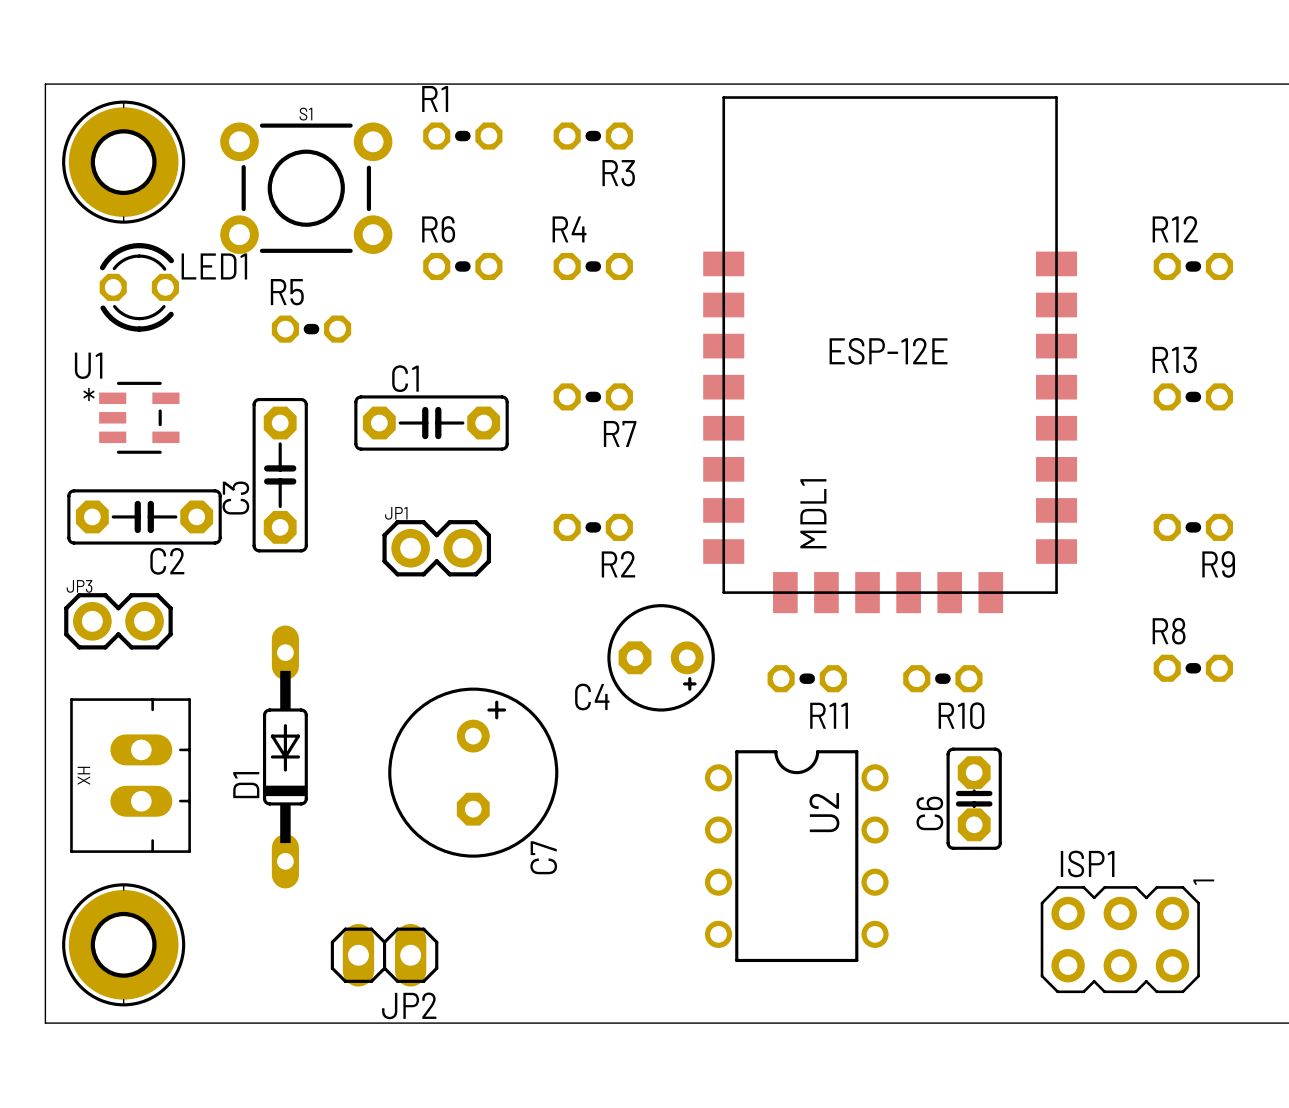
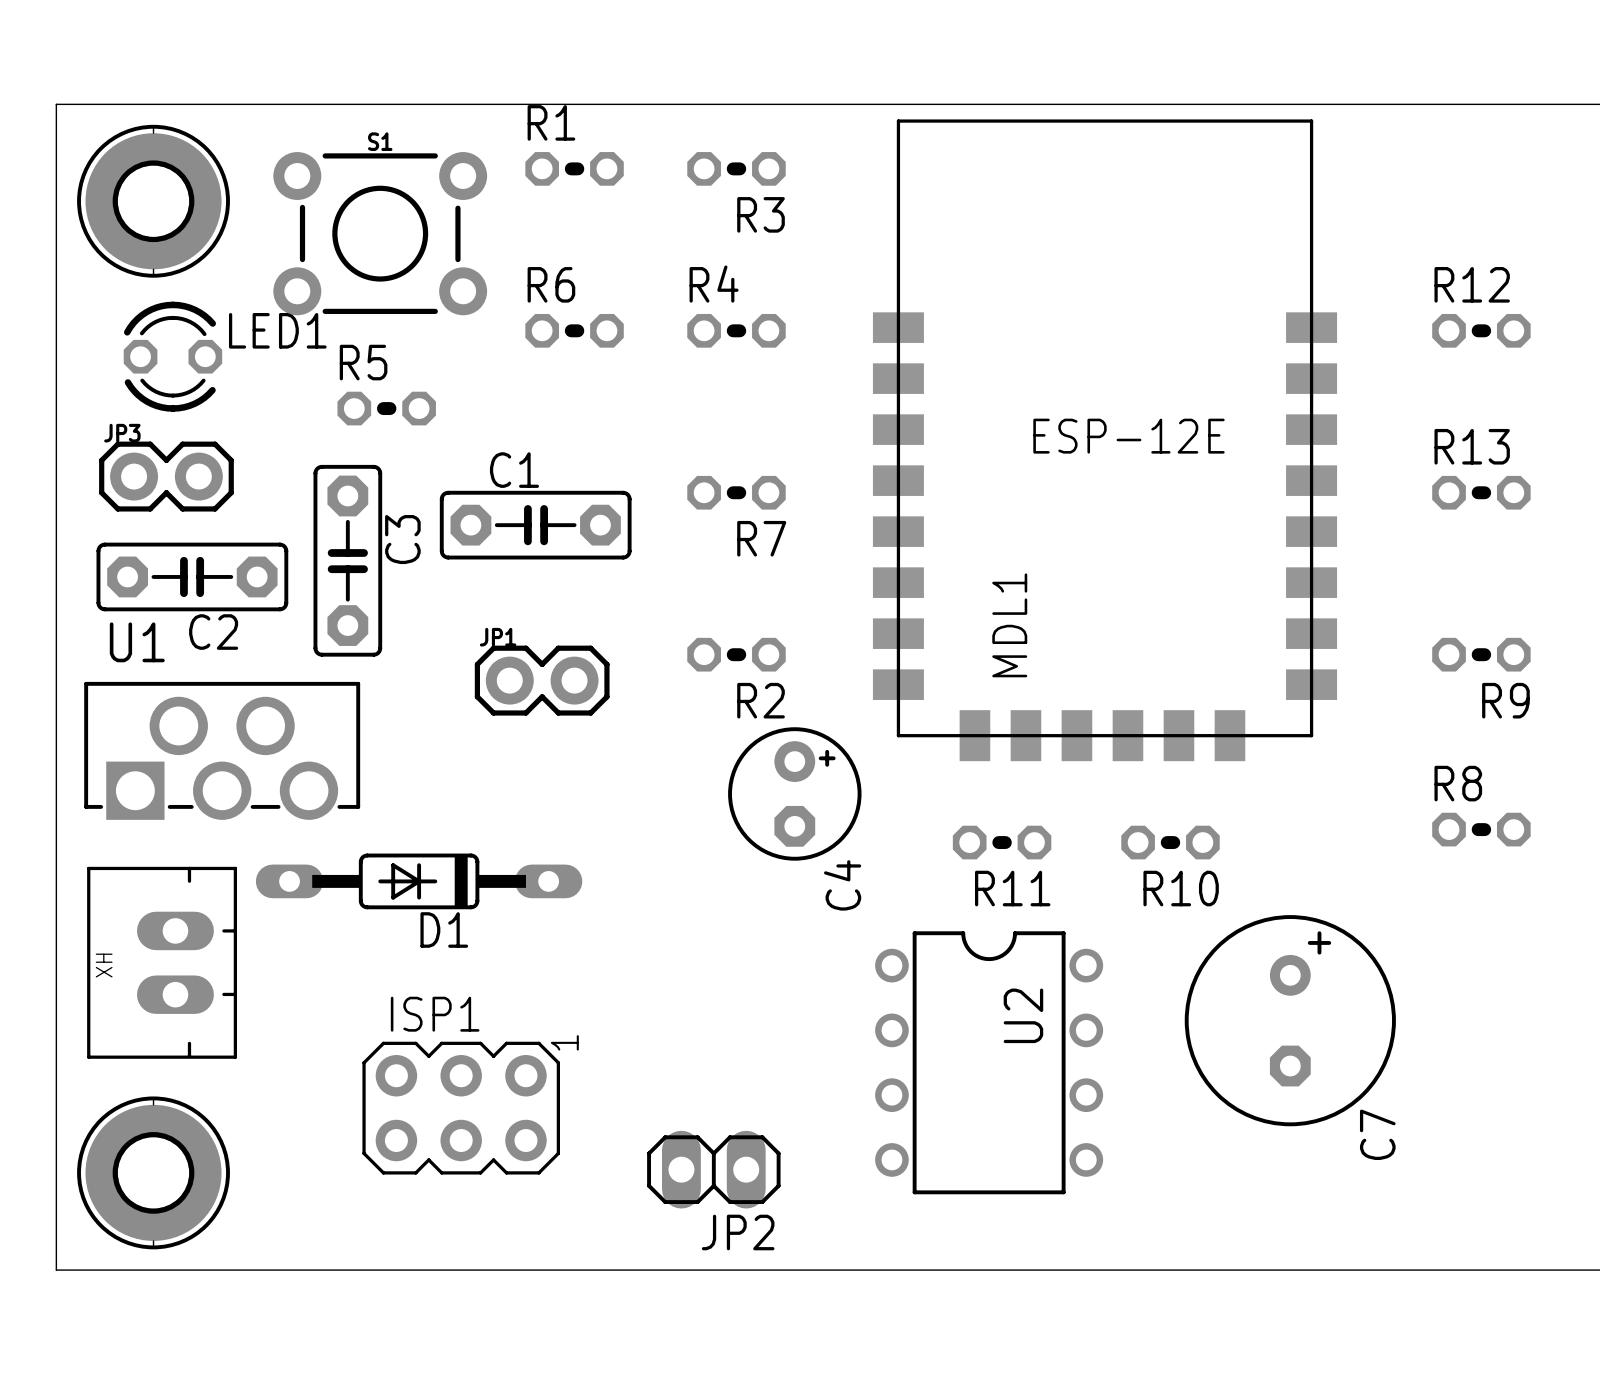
U1 name position: U1 (88, 365) -> U1 (137, 642)
U1 footprint: [99, 381, 180, 454] -> [84, 681, 361, 820]
C3 rotation: 0° (280, 475) -> 180° (347, 560)
C2 position: (144, 516) -> (192, 576)
JP3 position: (118, 621) -> (166, 476)
C4 rotation: 0° (661, 657) -> 90° counterclockwise (794, 793)
D1 rotation: 0° (285, 756) -> 90° counterclockwise (419, 881)
C7 position: (473, 772) -> (1290, 1020)
C6: (974, 798) -> none
ISP1 position: (1120, 939) -> (461, 1108)
JP2 position: (384, 955) -> (713, 1169)

